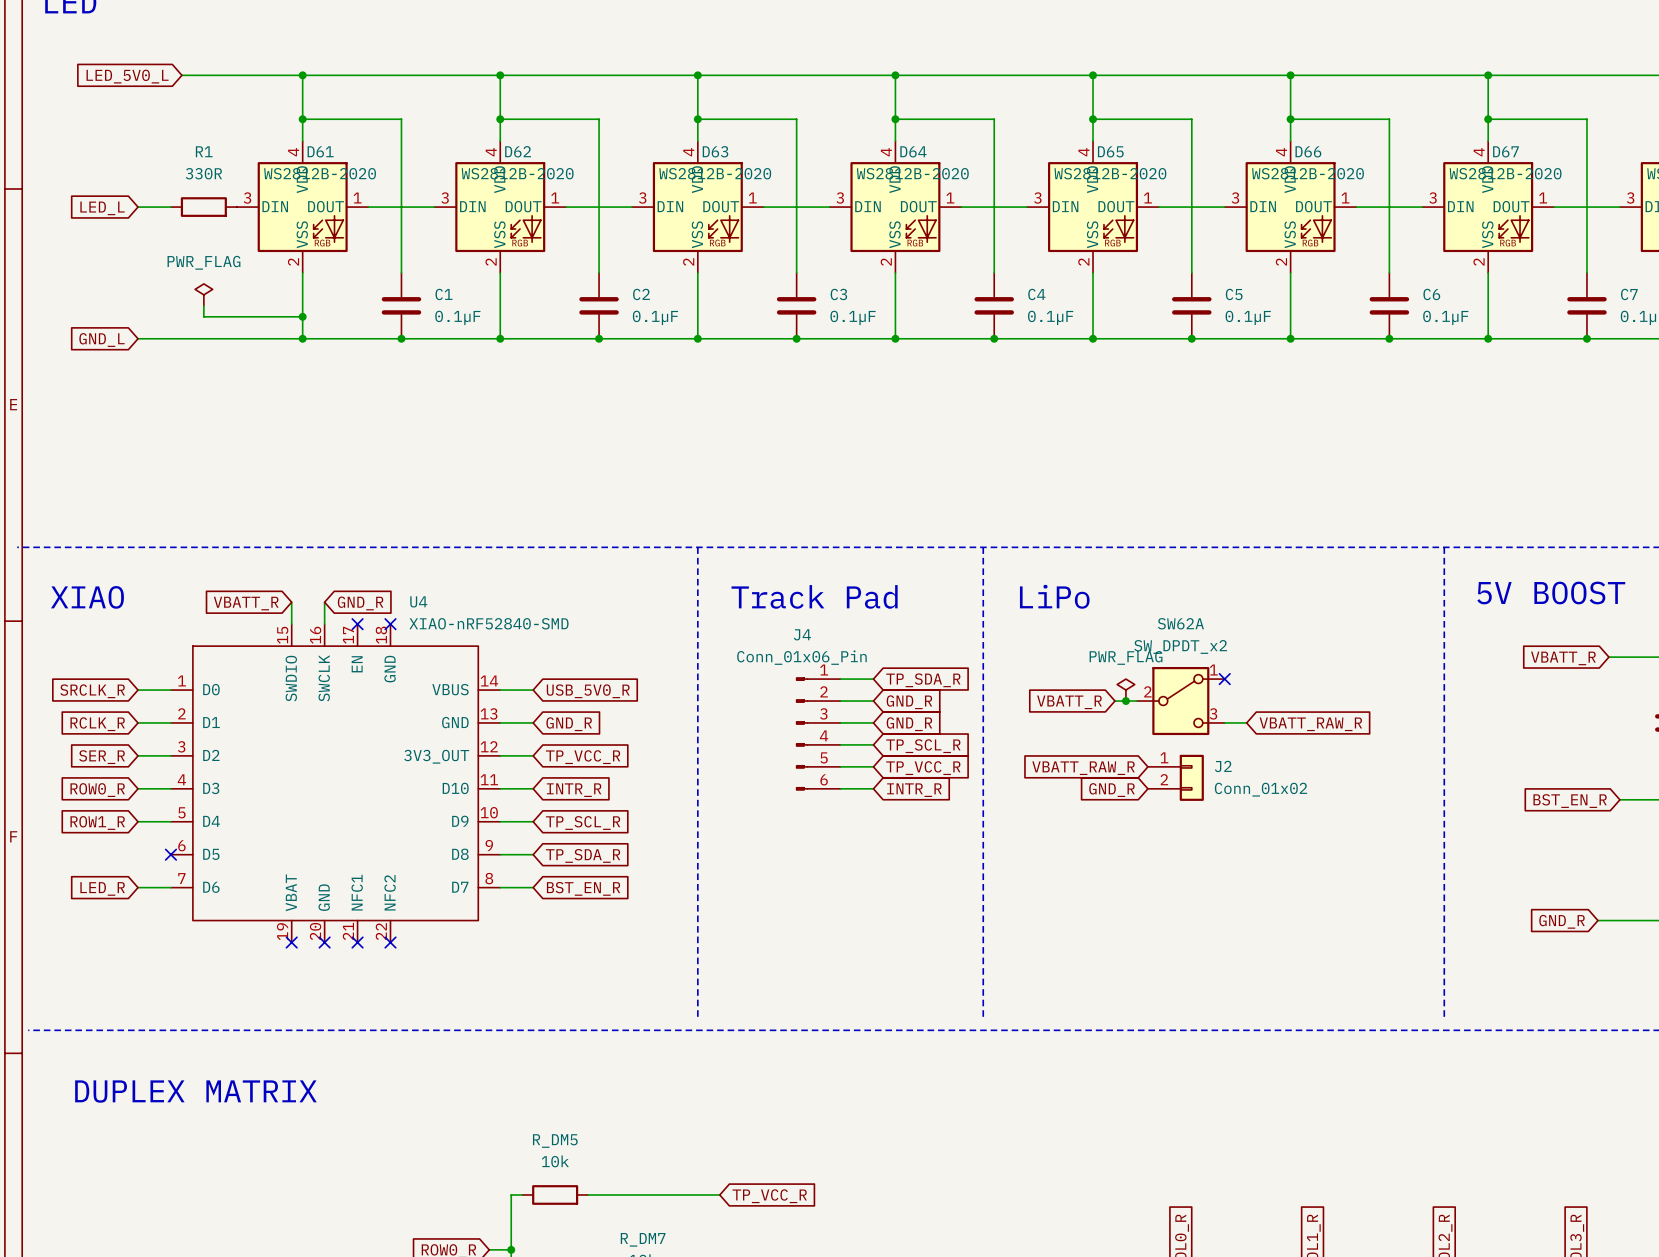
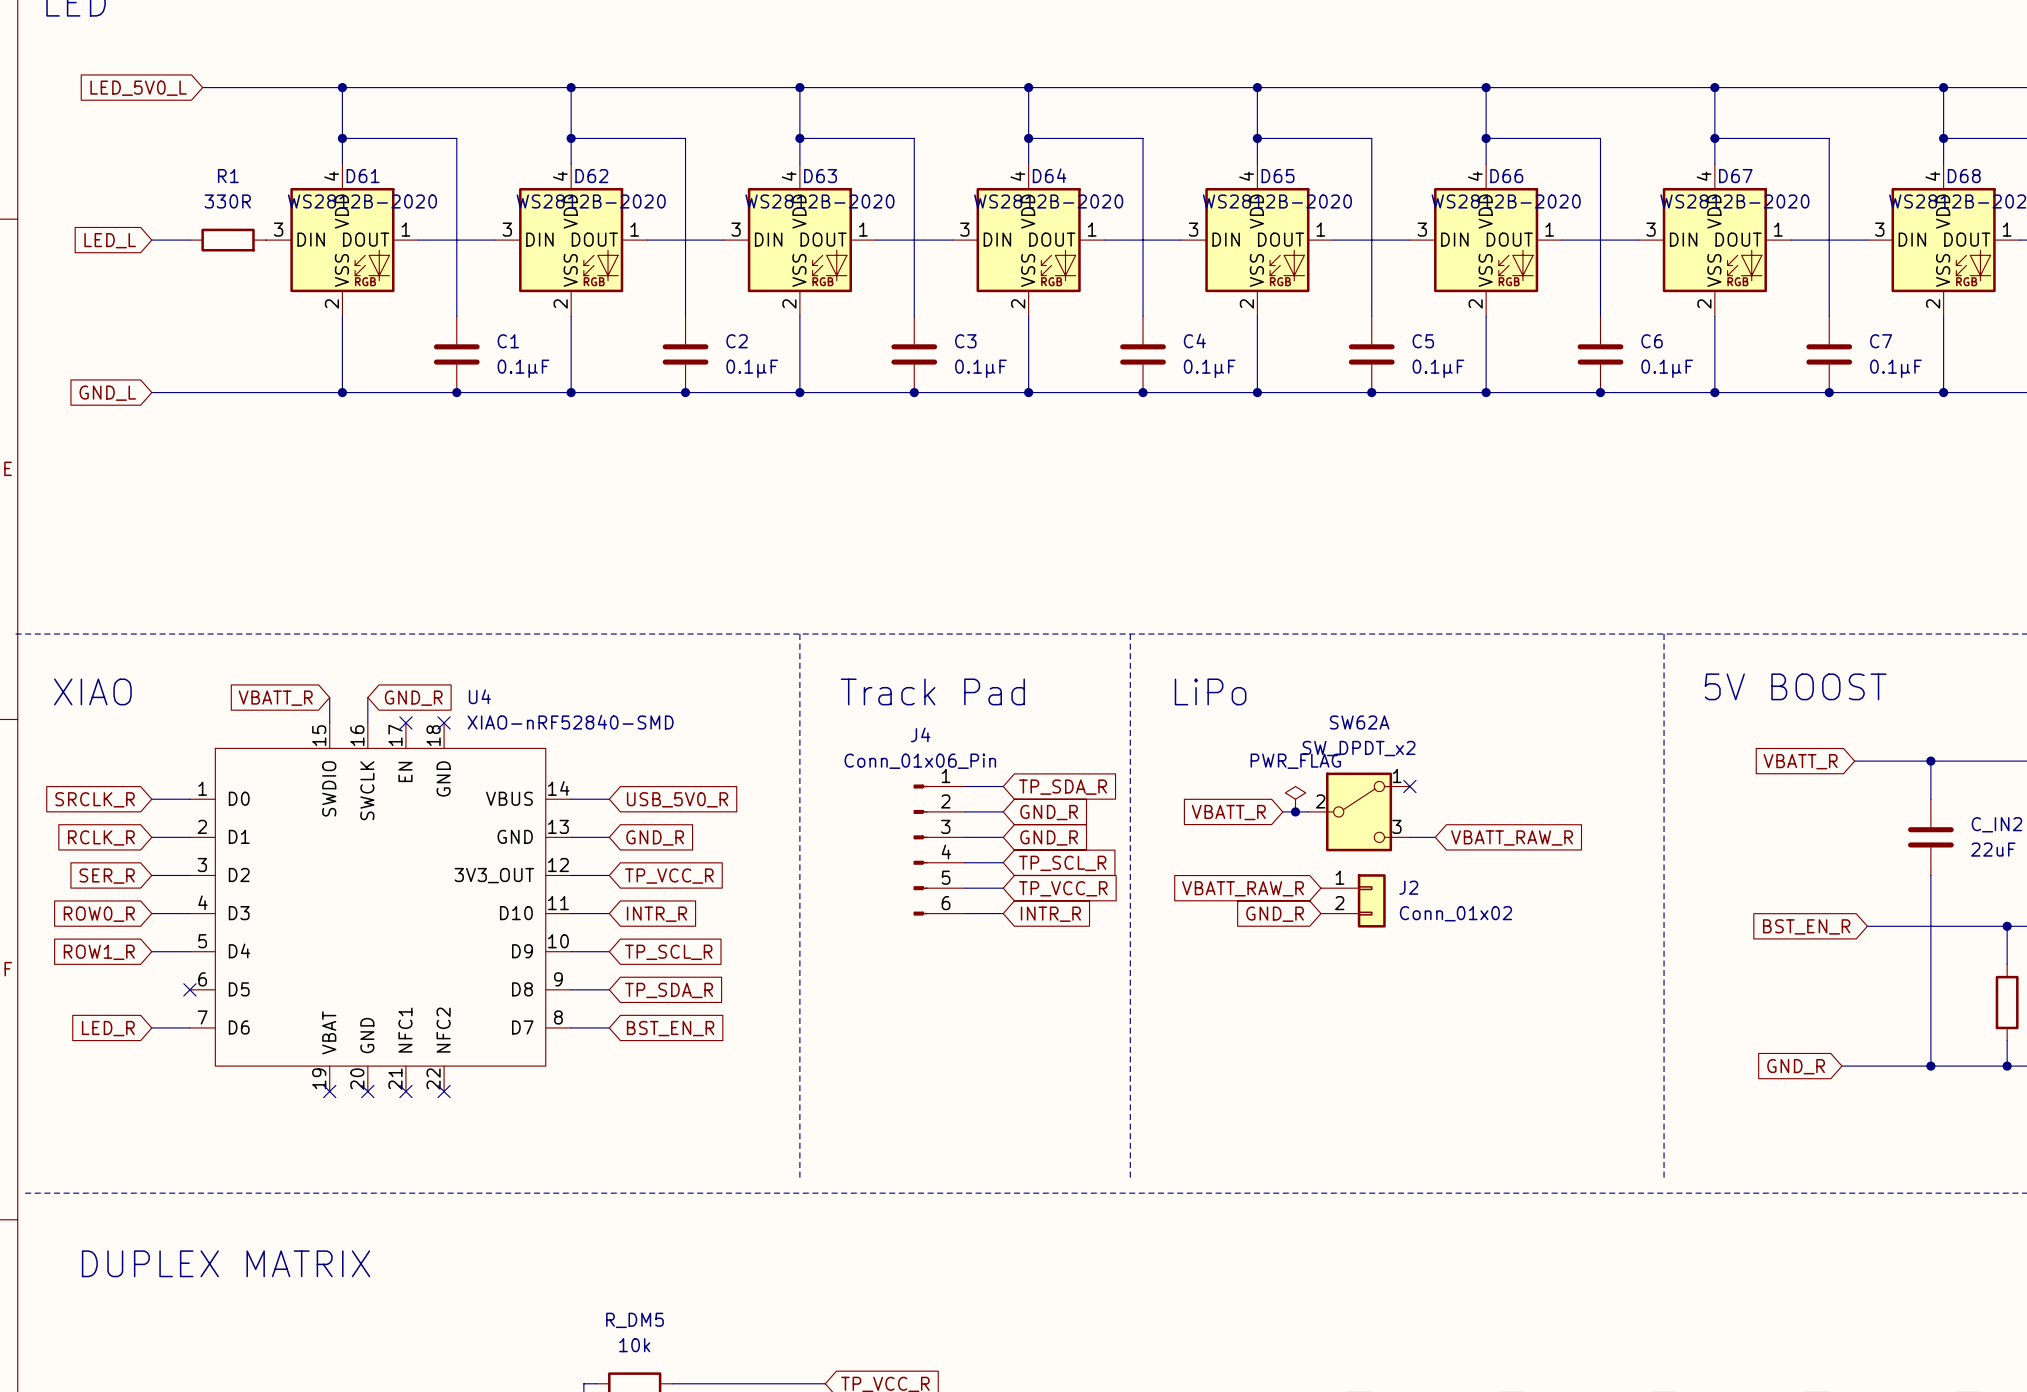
power symbol: PWR_FLAG (203, 294) -> none
wire: (203, 305) (203, 316) (302, 316) -> none
junction: (302, 316) -> none

